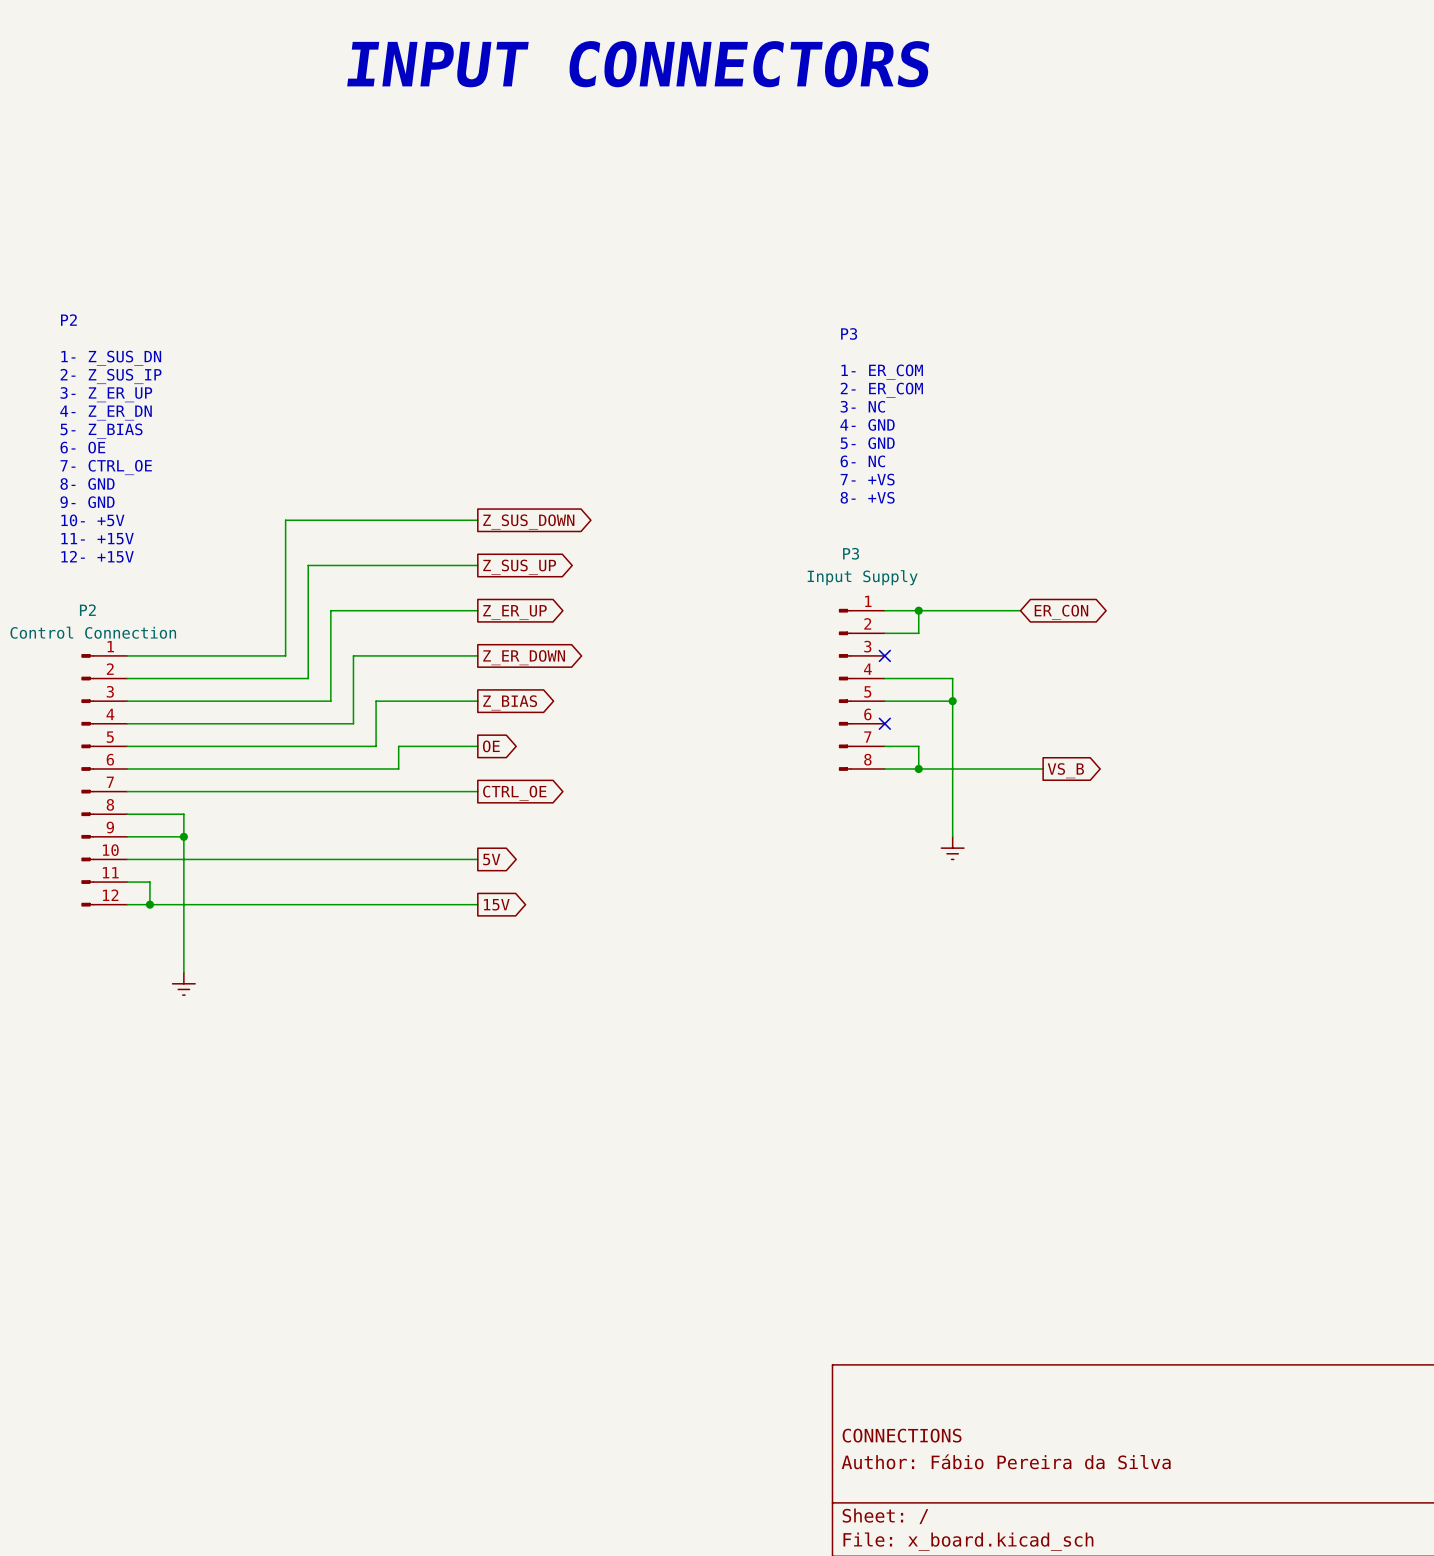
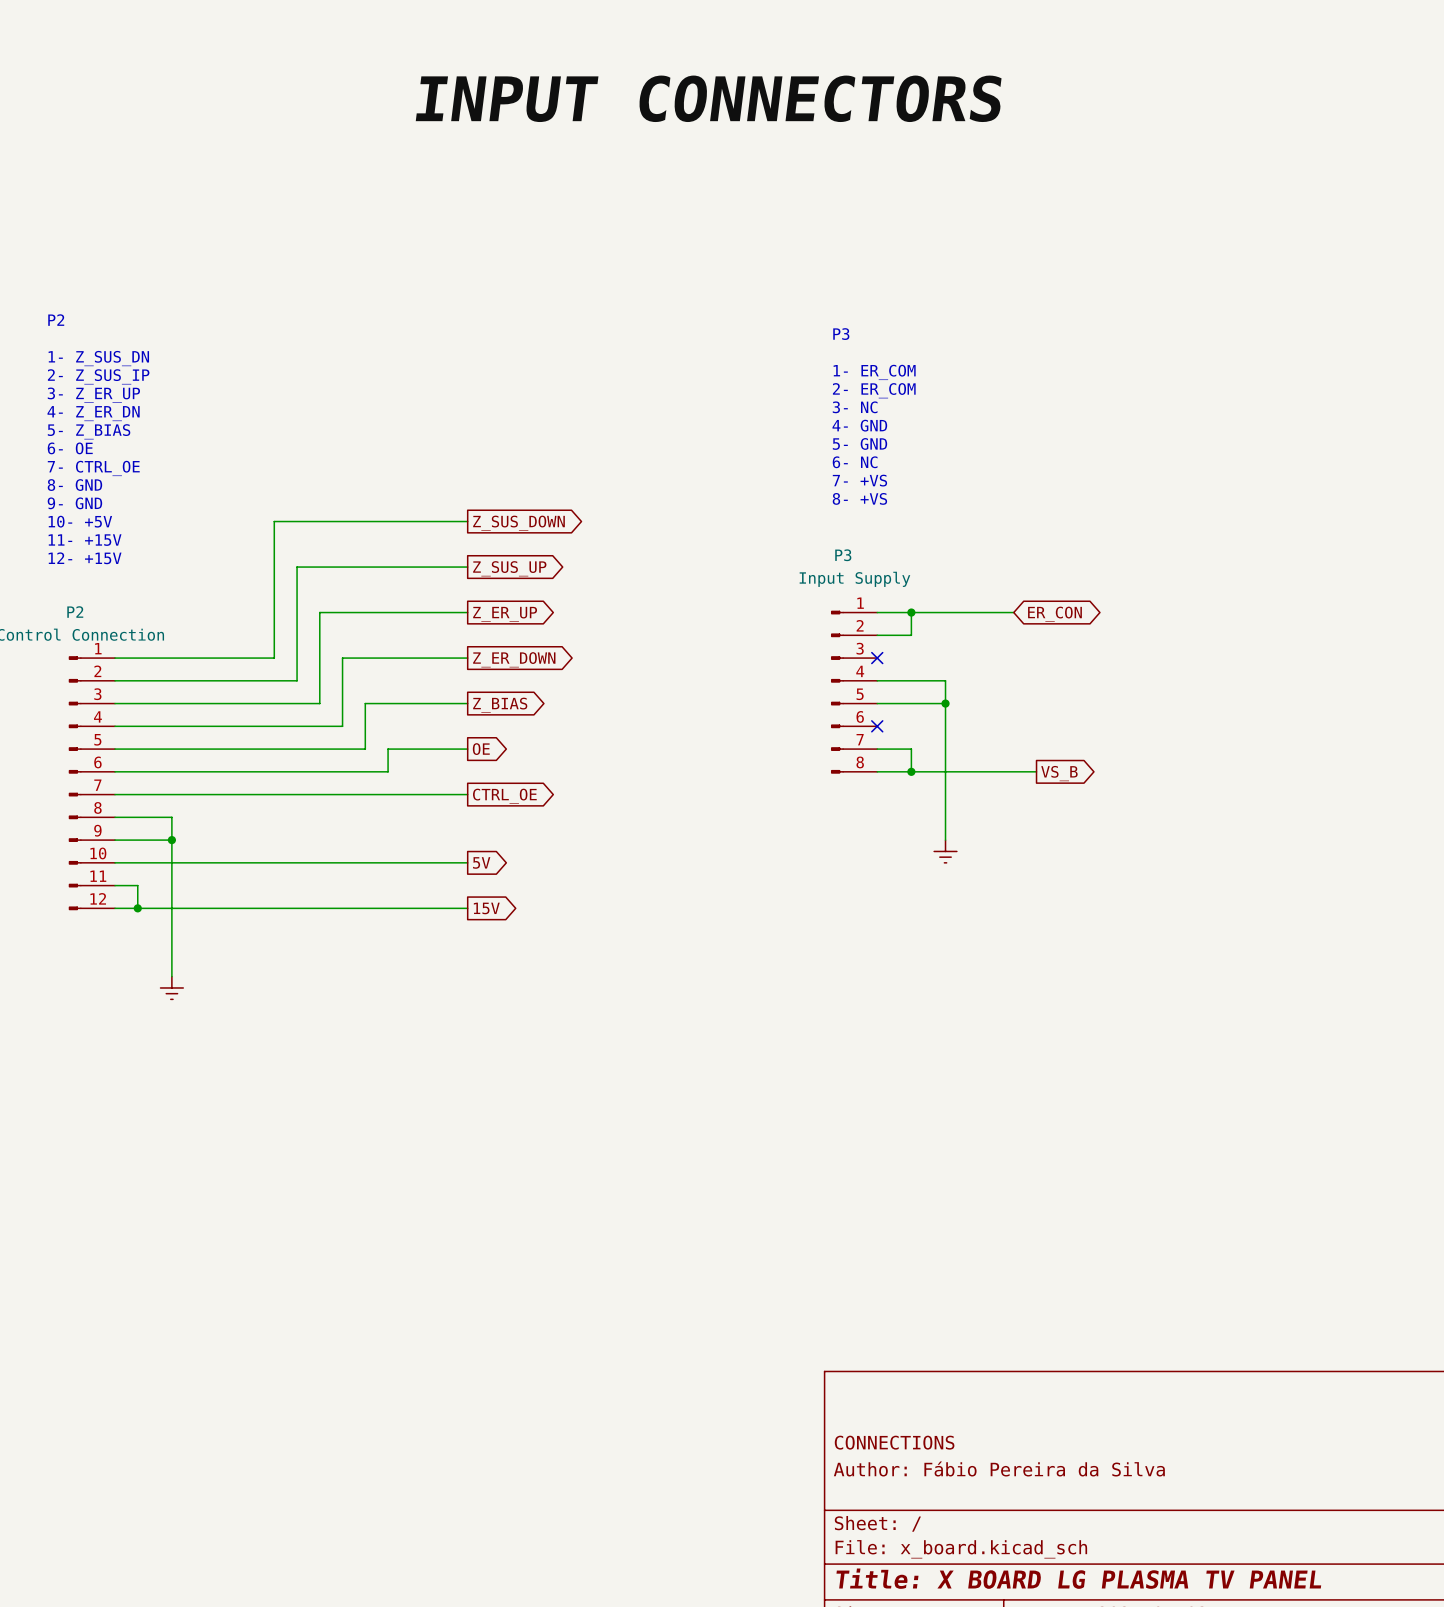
text: INPUT CONNECTORS (638, 64) -> none
label: none -> INPUT CONNECTORS (708, 98)

